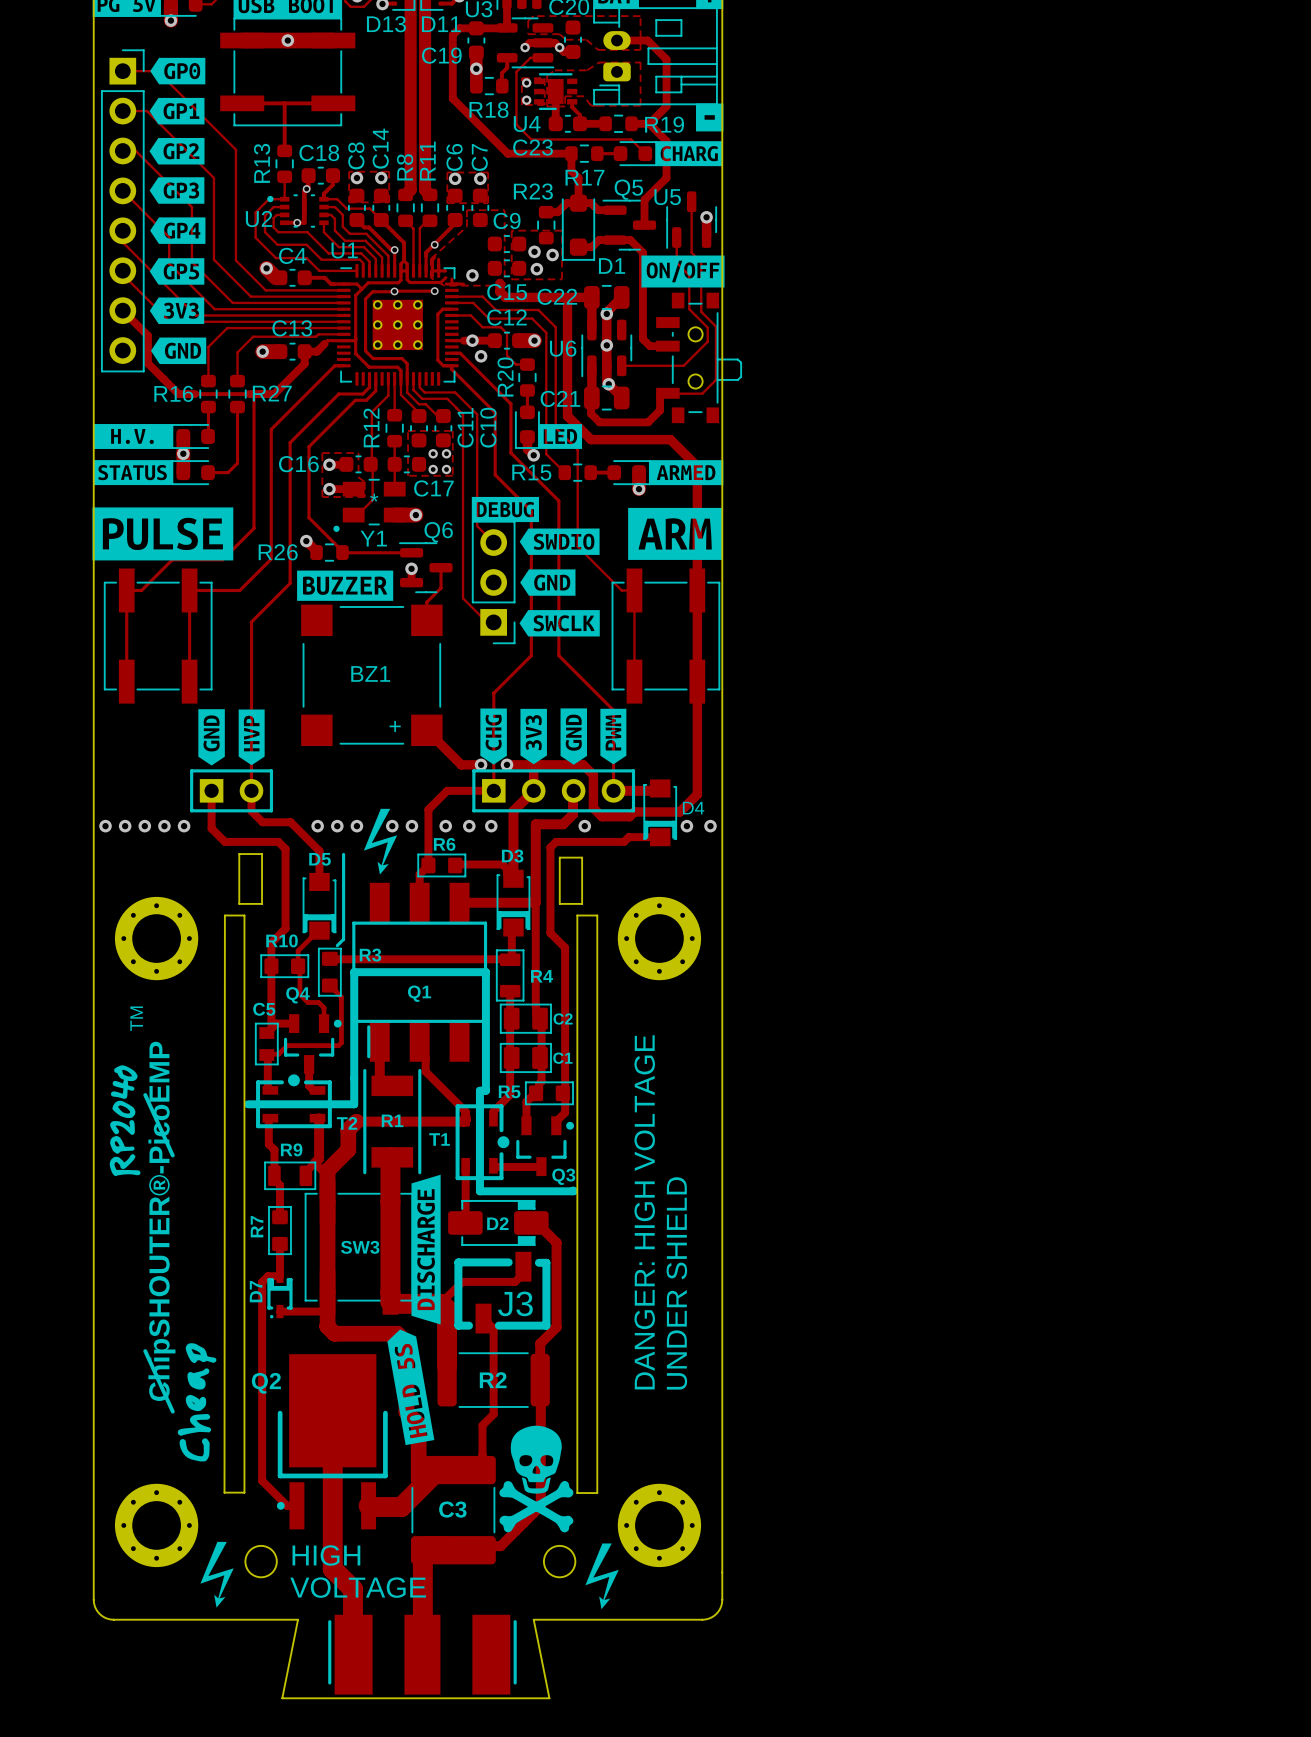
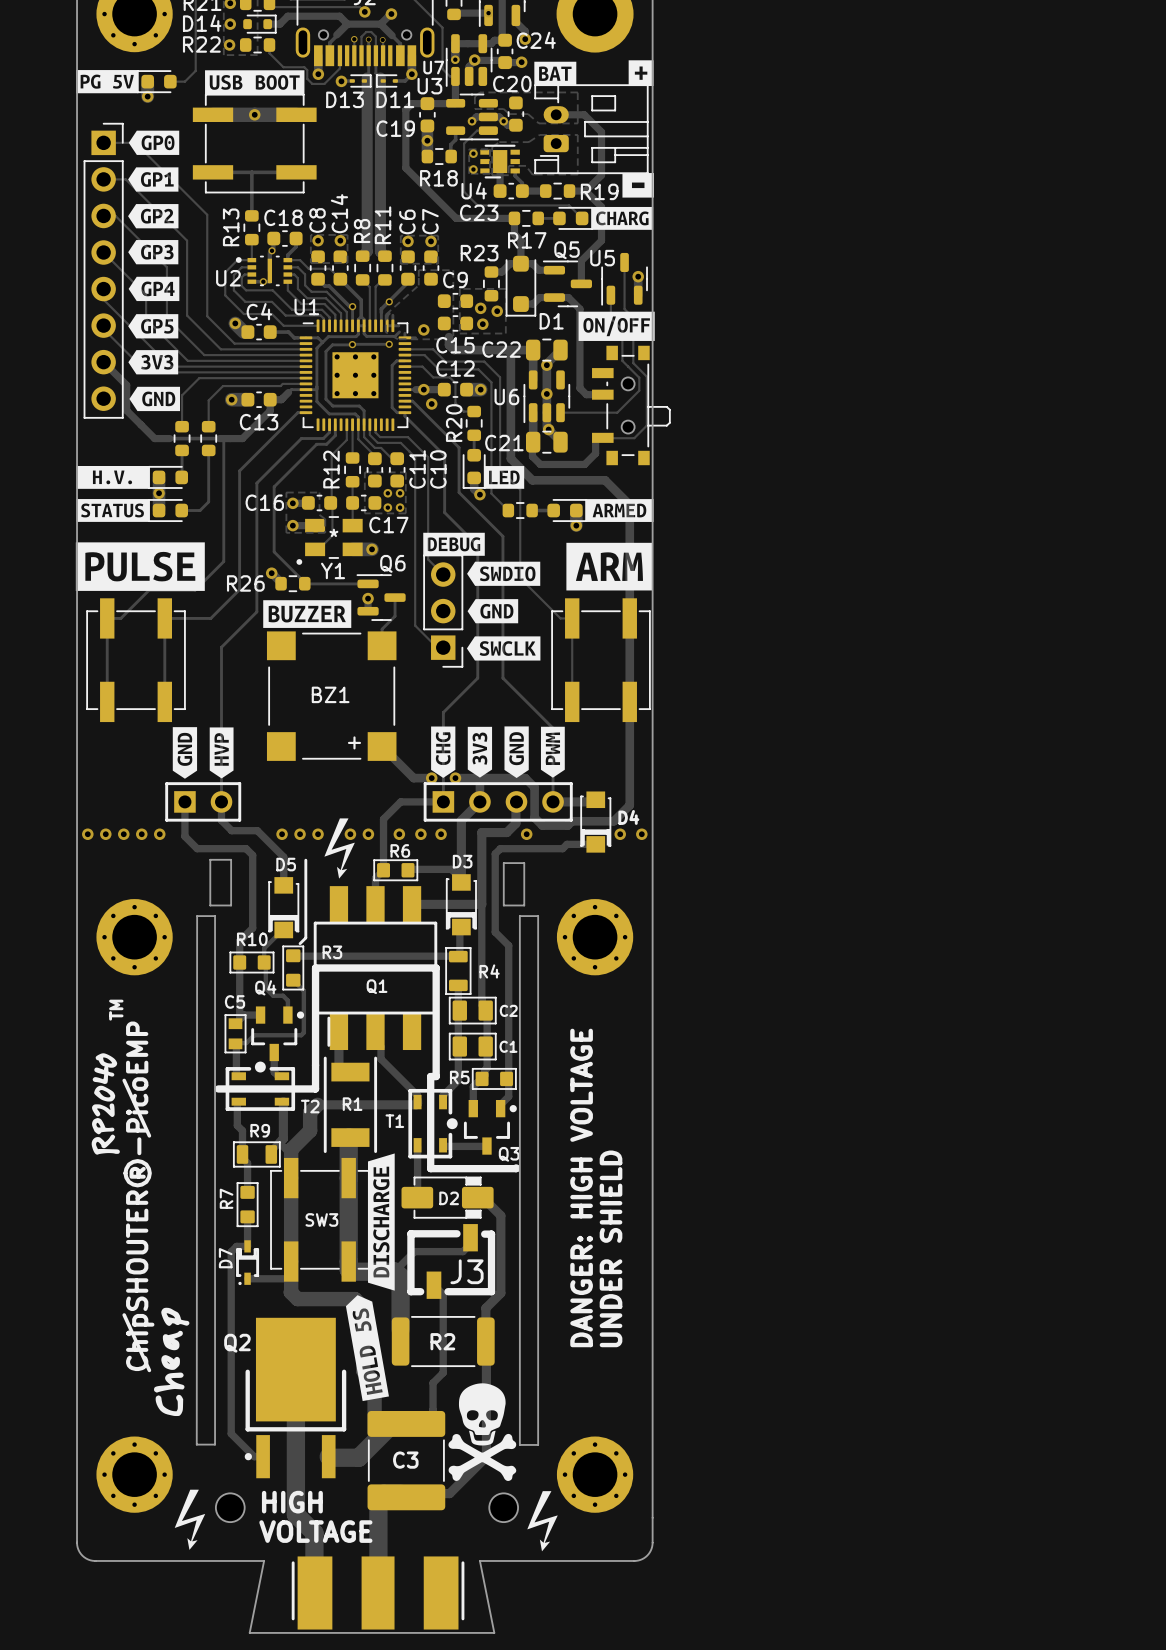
drawing shape: [696, 103, 724, 132] -> [622, 173, 655, 198]
C13 name position: C13 (292, 328) -> C13 (259, 422)
R16 name: R16 (173, 393) -> none
R27 name: R27 (272, 393) -> none
R15 name: R15 (531, 472) -> none

